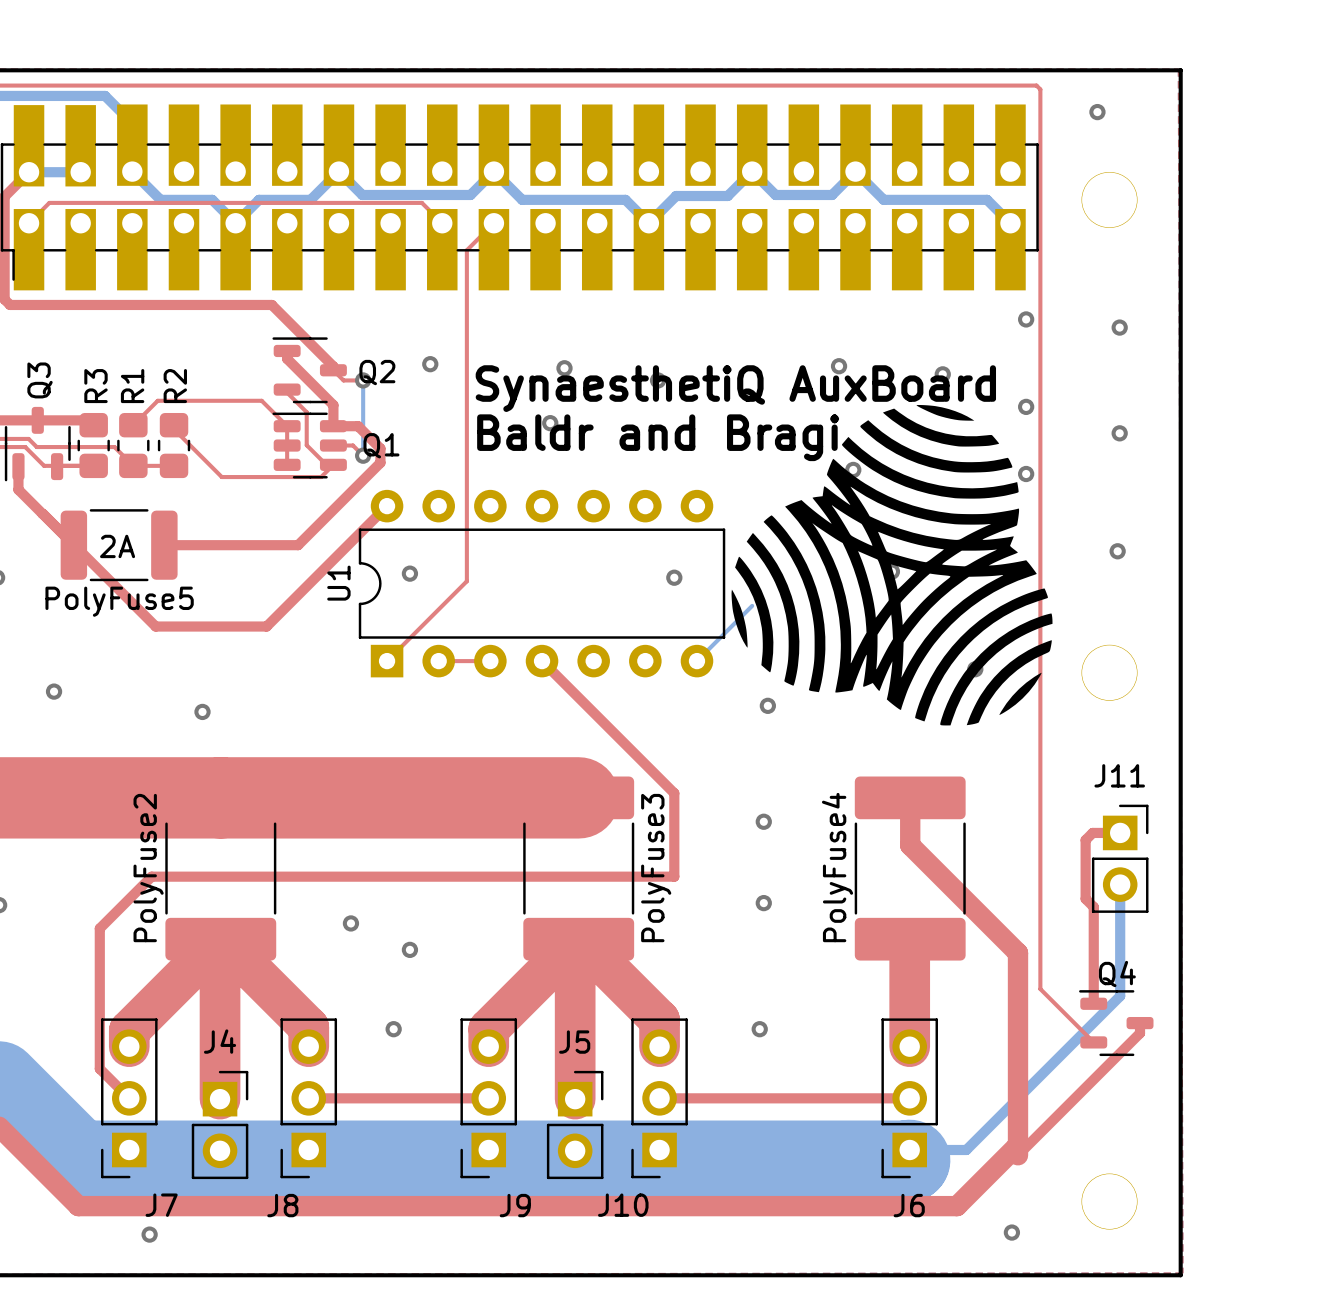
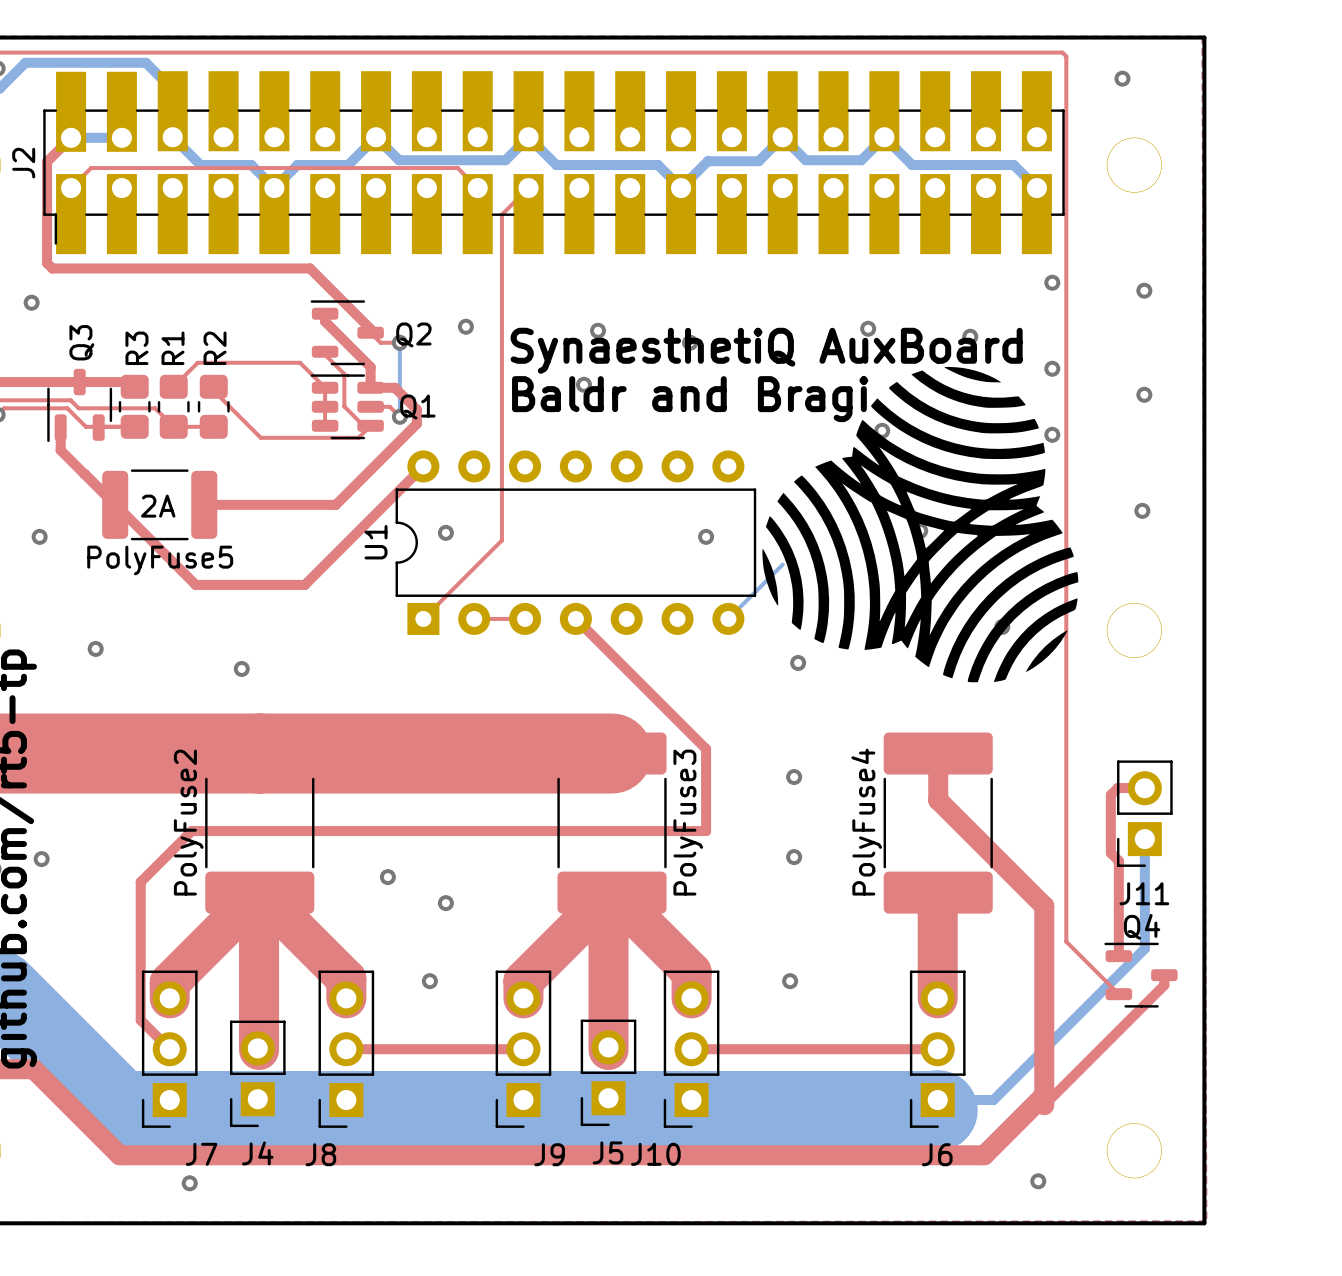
J11 rotation: 0° (1120, 858) -> 180° (1144, 813)
J4 rotation: 0° (220, 1124) -> 180° (257, 1073)
J5 rotation: 0° (575, 1124) -> 180° (608, 1072)

